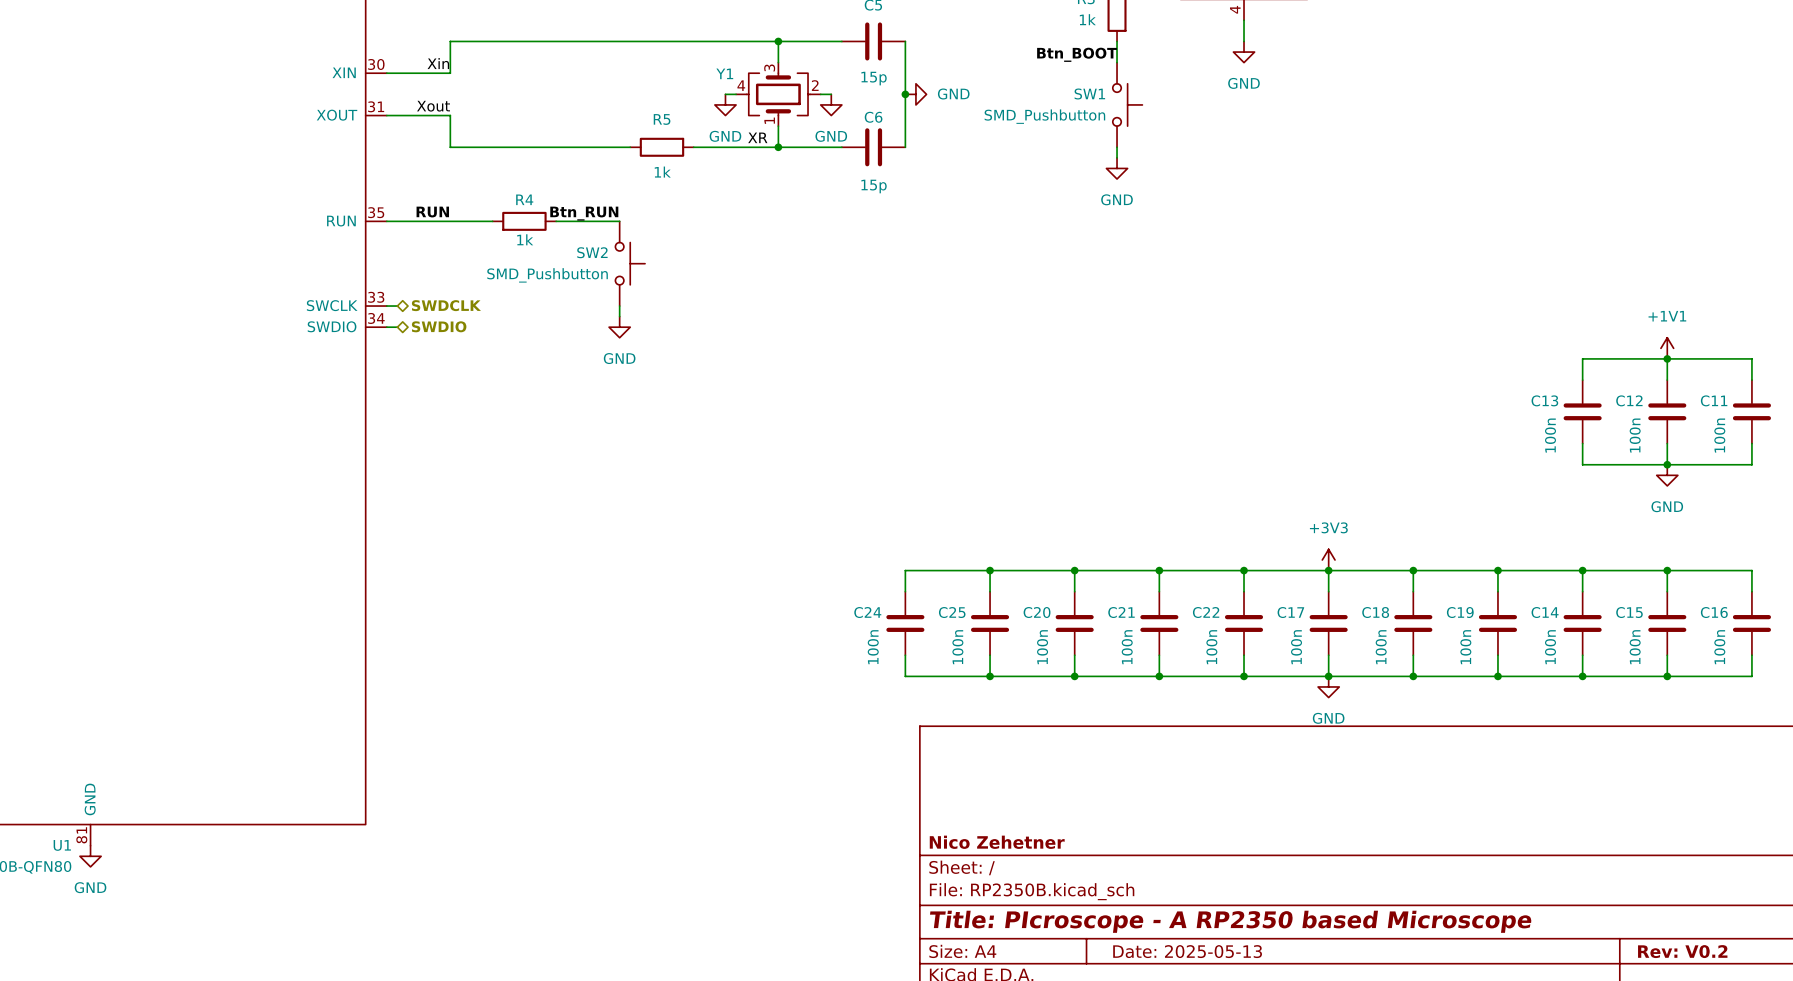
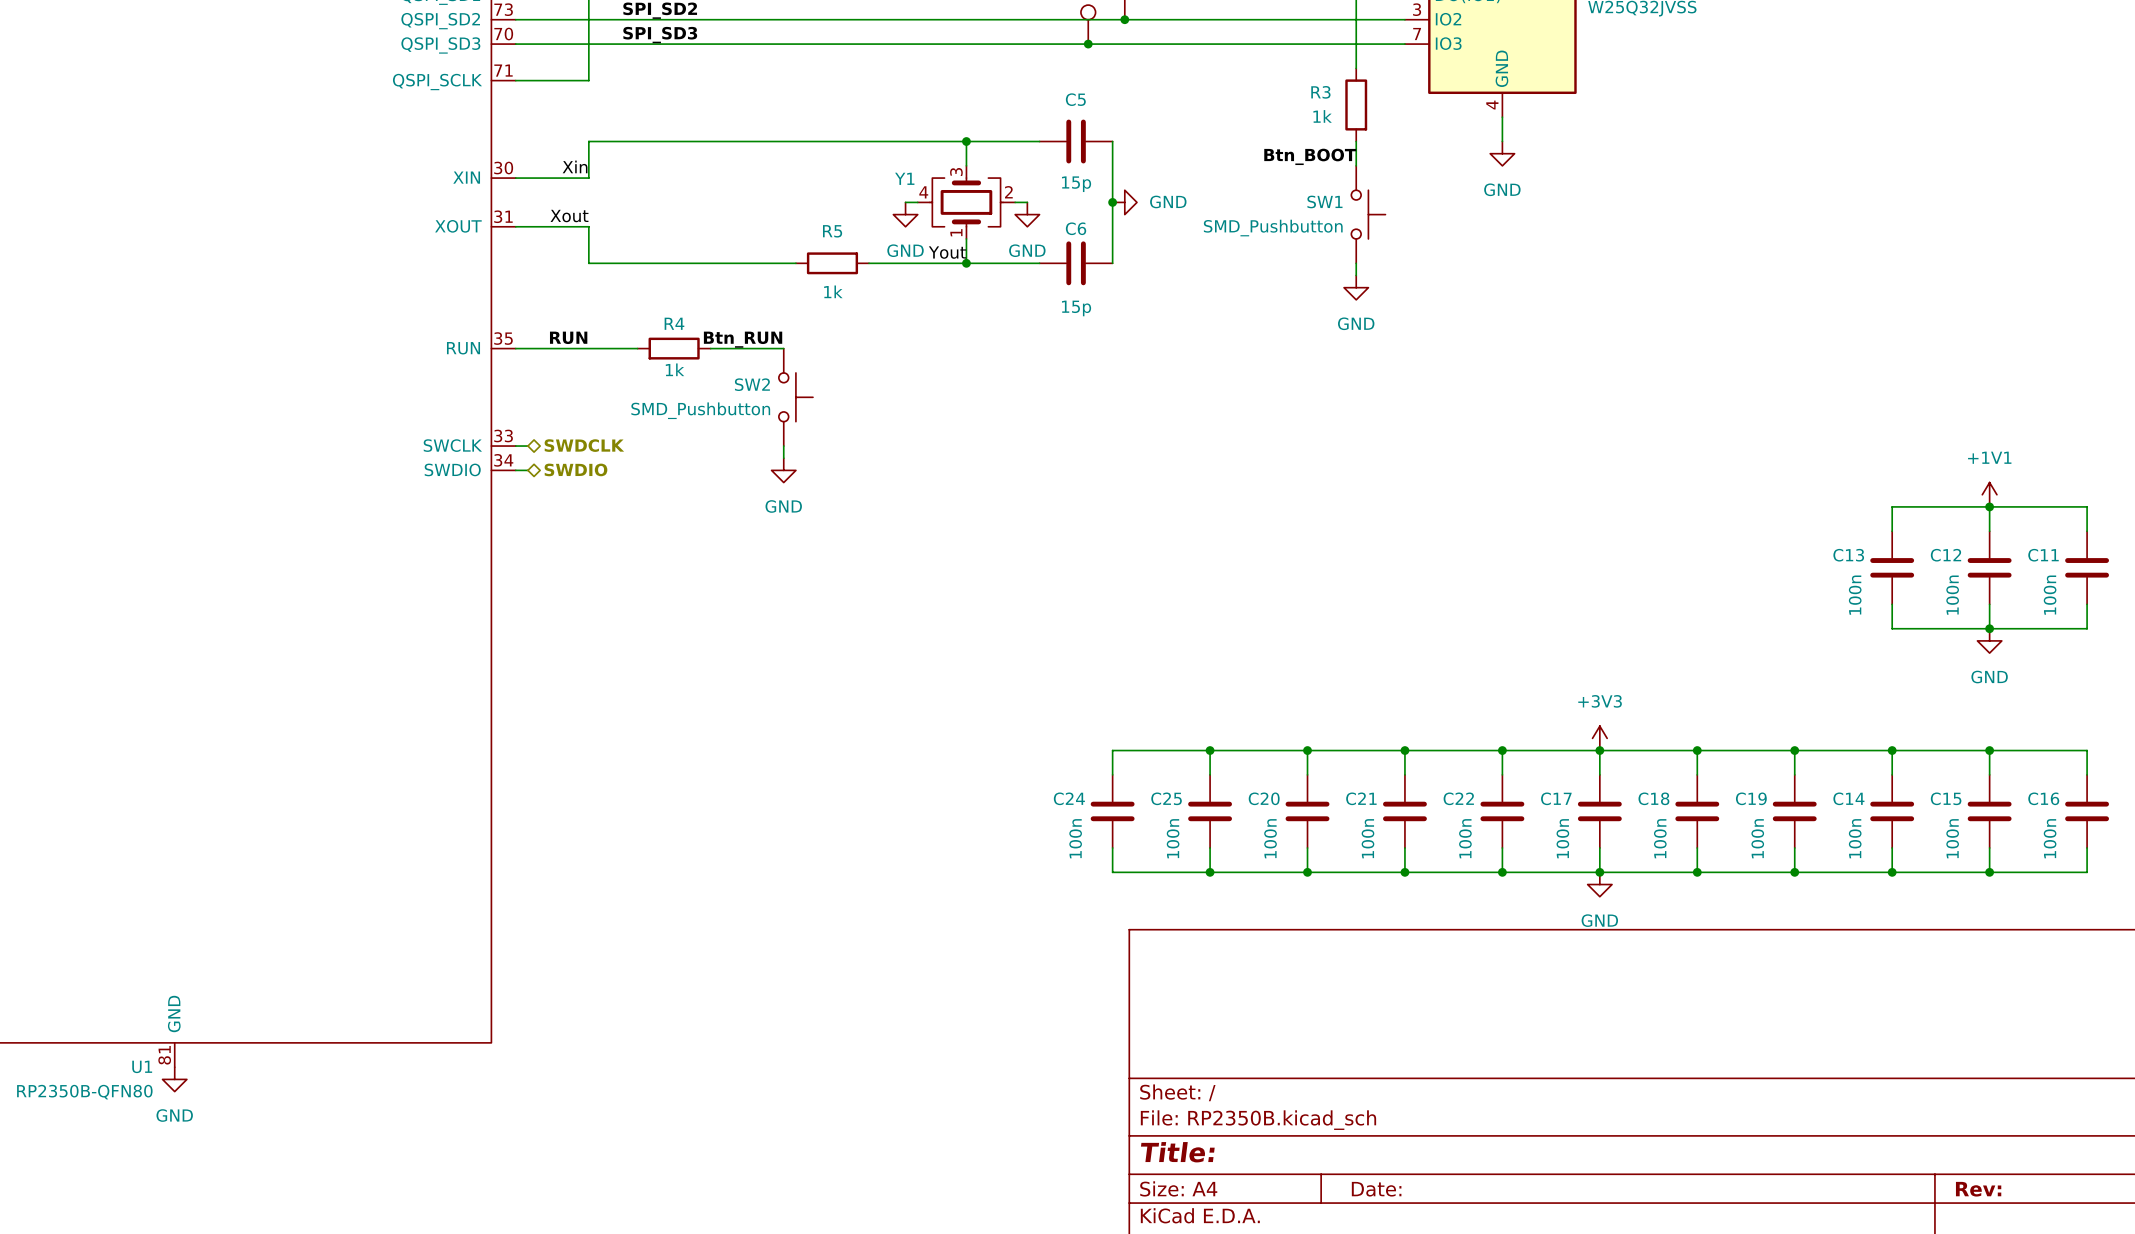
label: XR (757, 137) -> none
label: none -> Yout (947, 252)
title block: Nico Zehetner (997, 842) -> none
title block: Title: PIcroscope - A RP2350 based Microscope (1230, 921) -> Title: (1177, 1152)
title block: Date: 2025-05-13 (1187, 951) -> Date: (1376, 1189)
title block: Rev: V0.2 (1682, 951) -> Rev: (1978, 1189)

